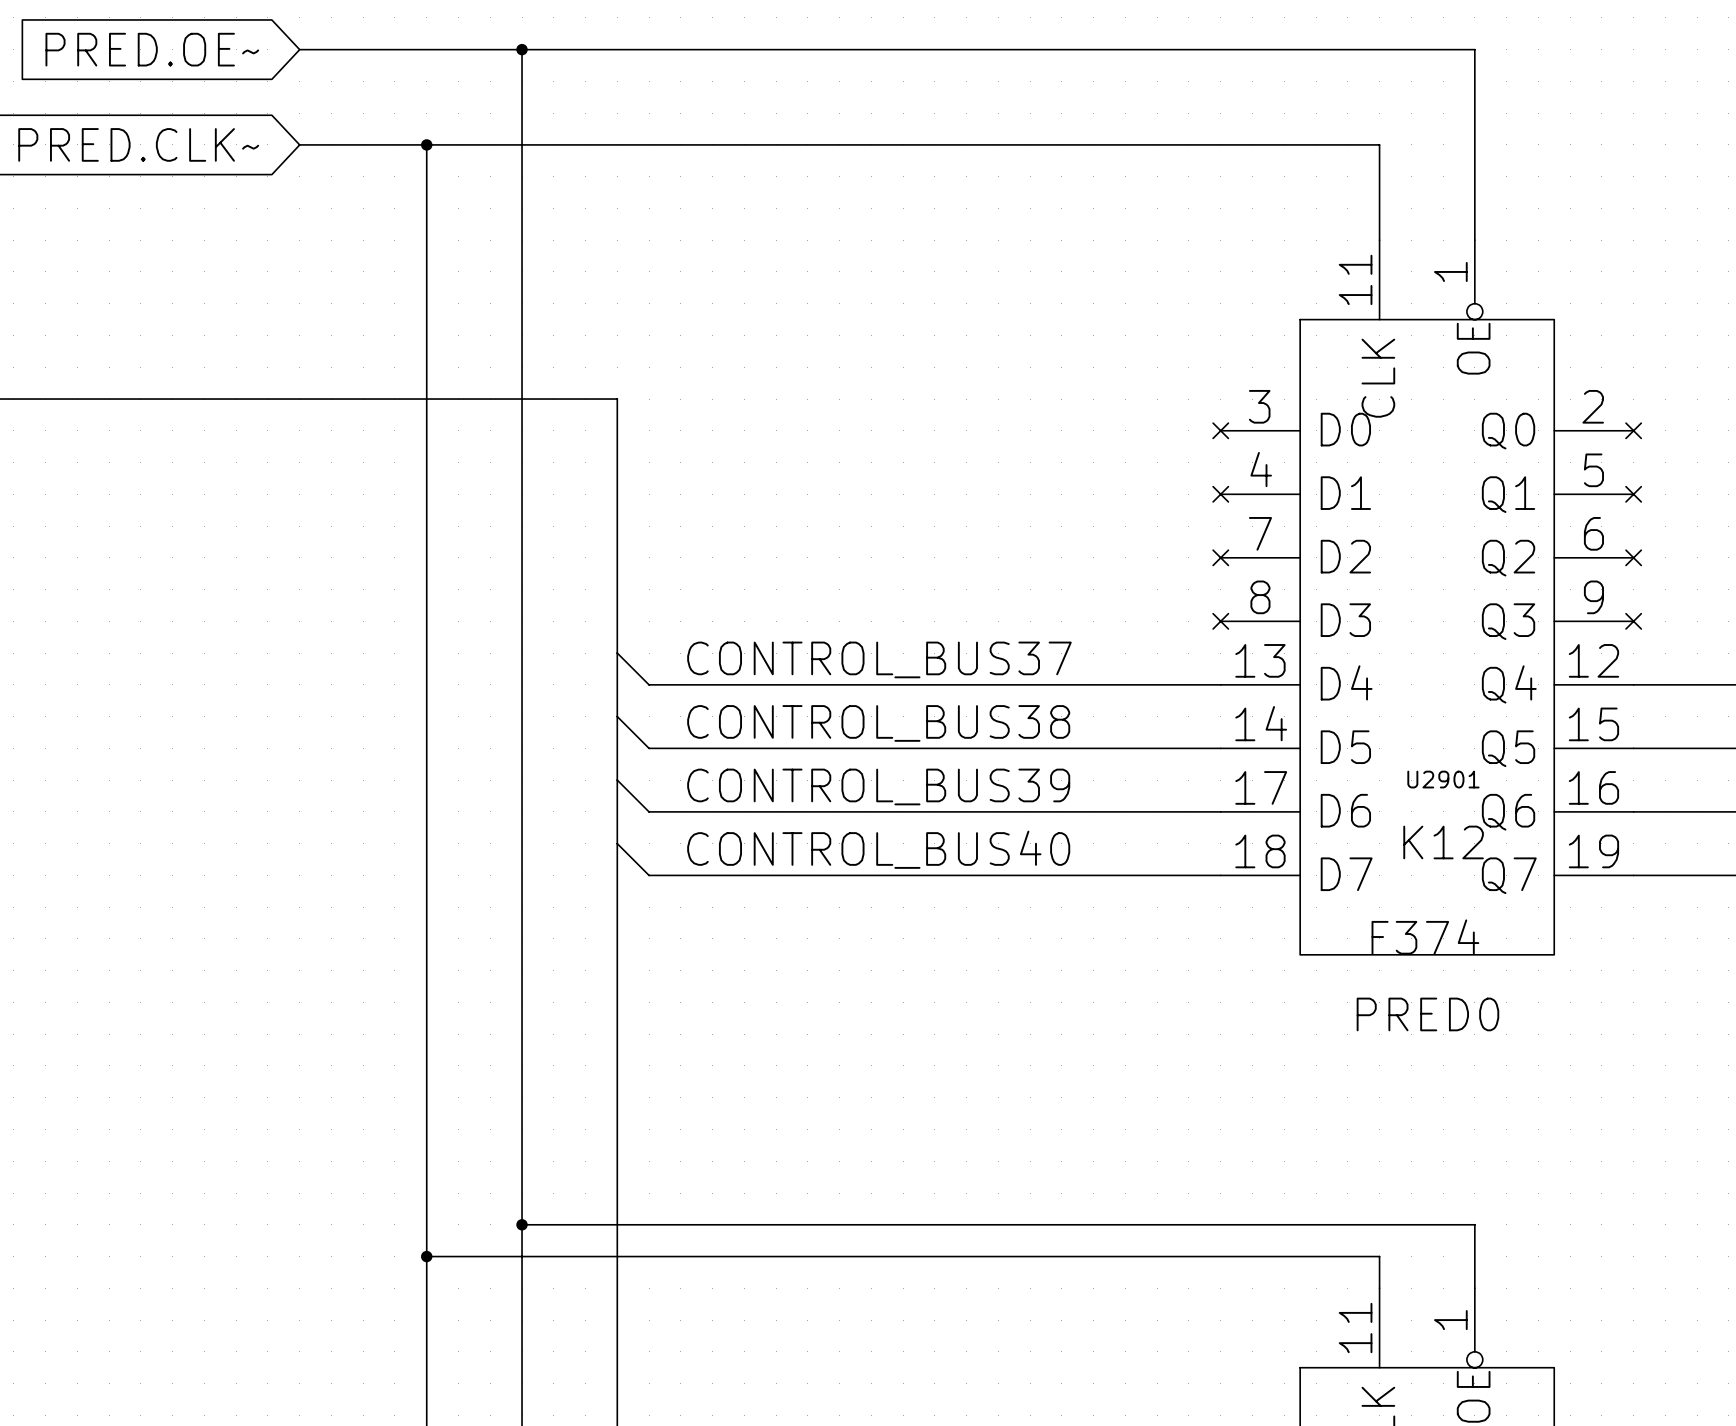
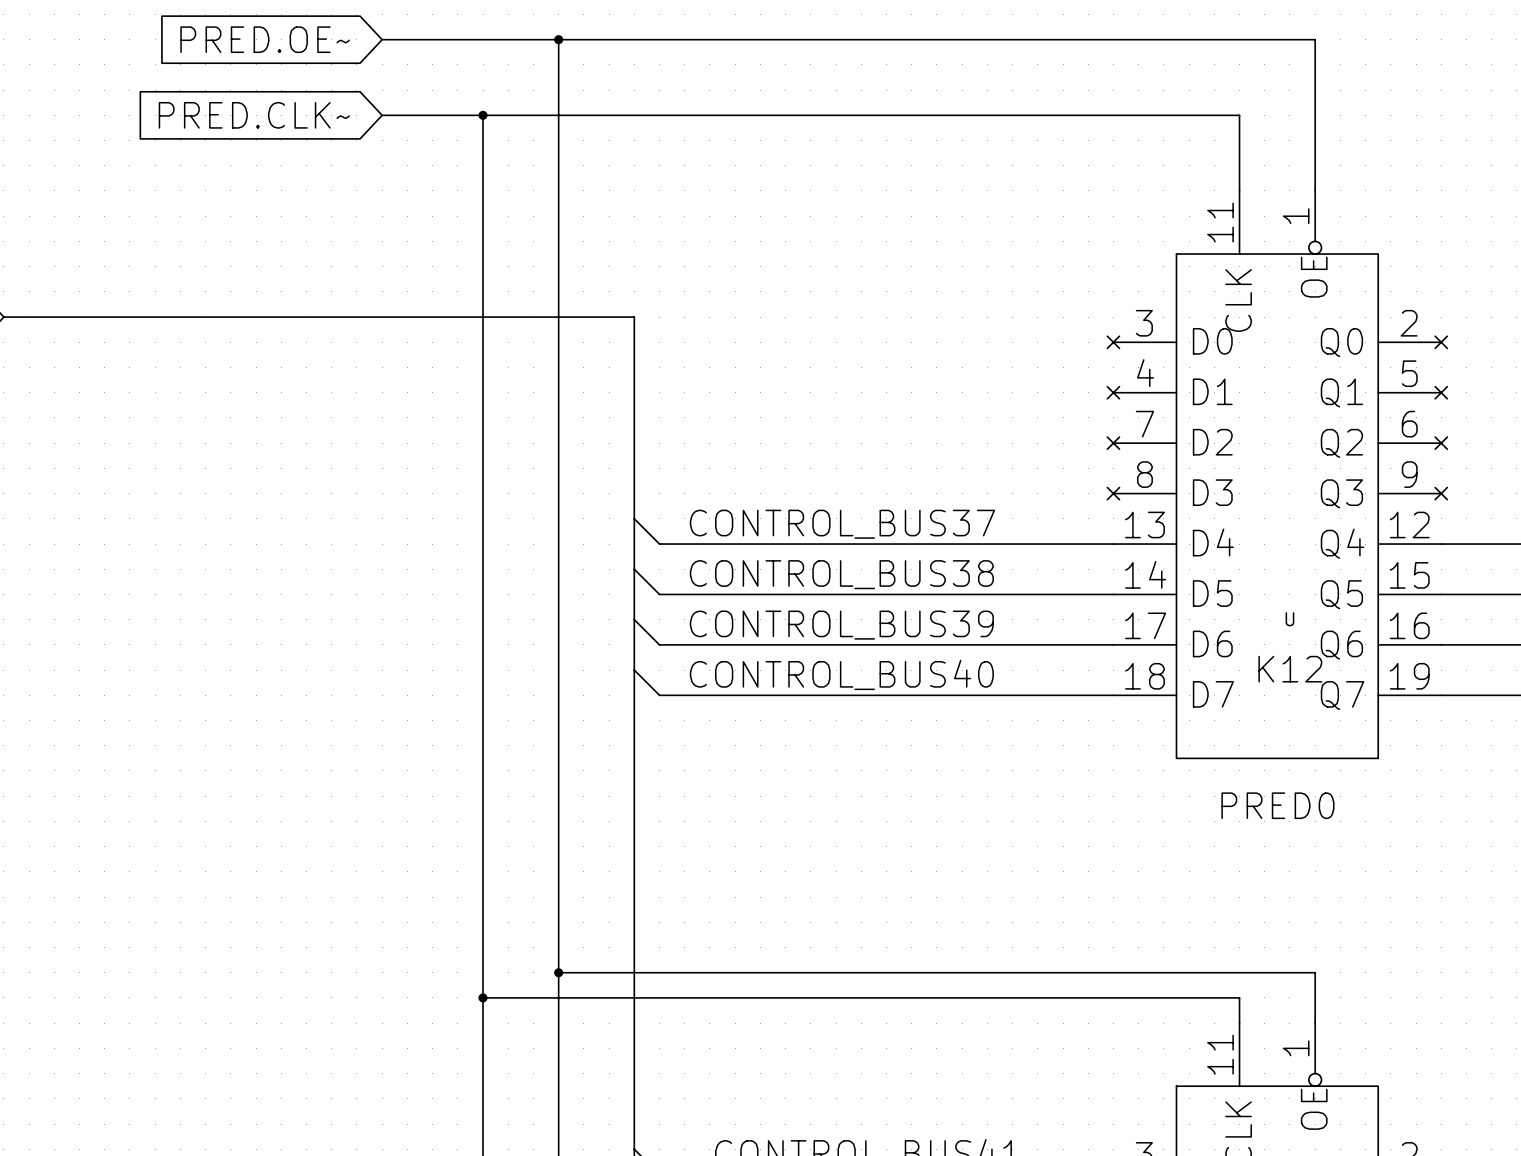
U2901 name: U2901 (1443, 779) -> U (1289, 619)
U2901 value: F374 (1425, 937) -> none

